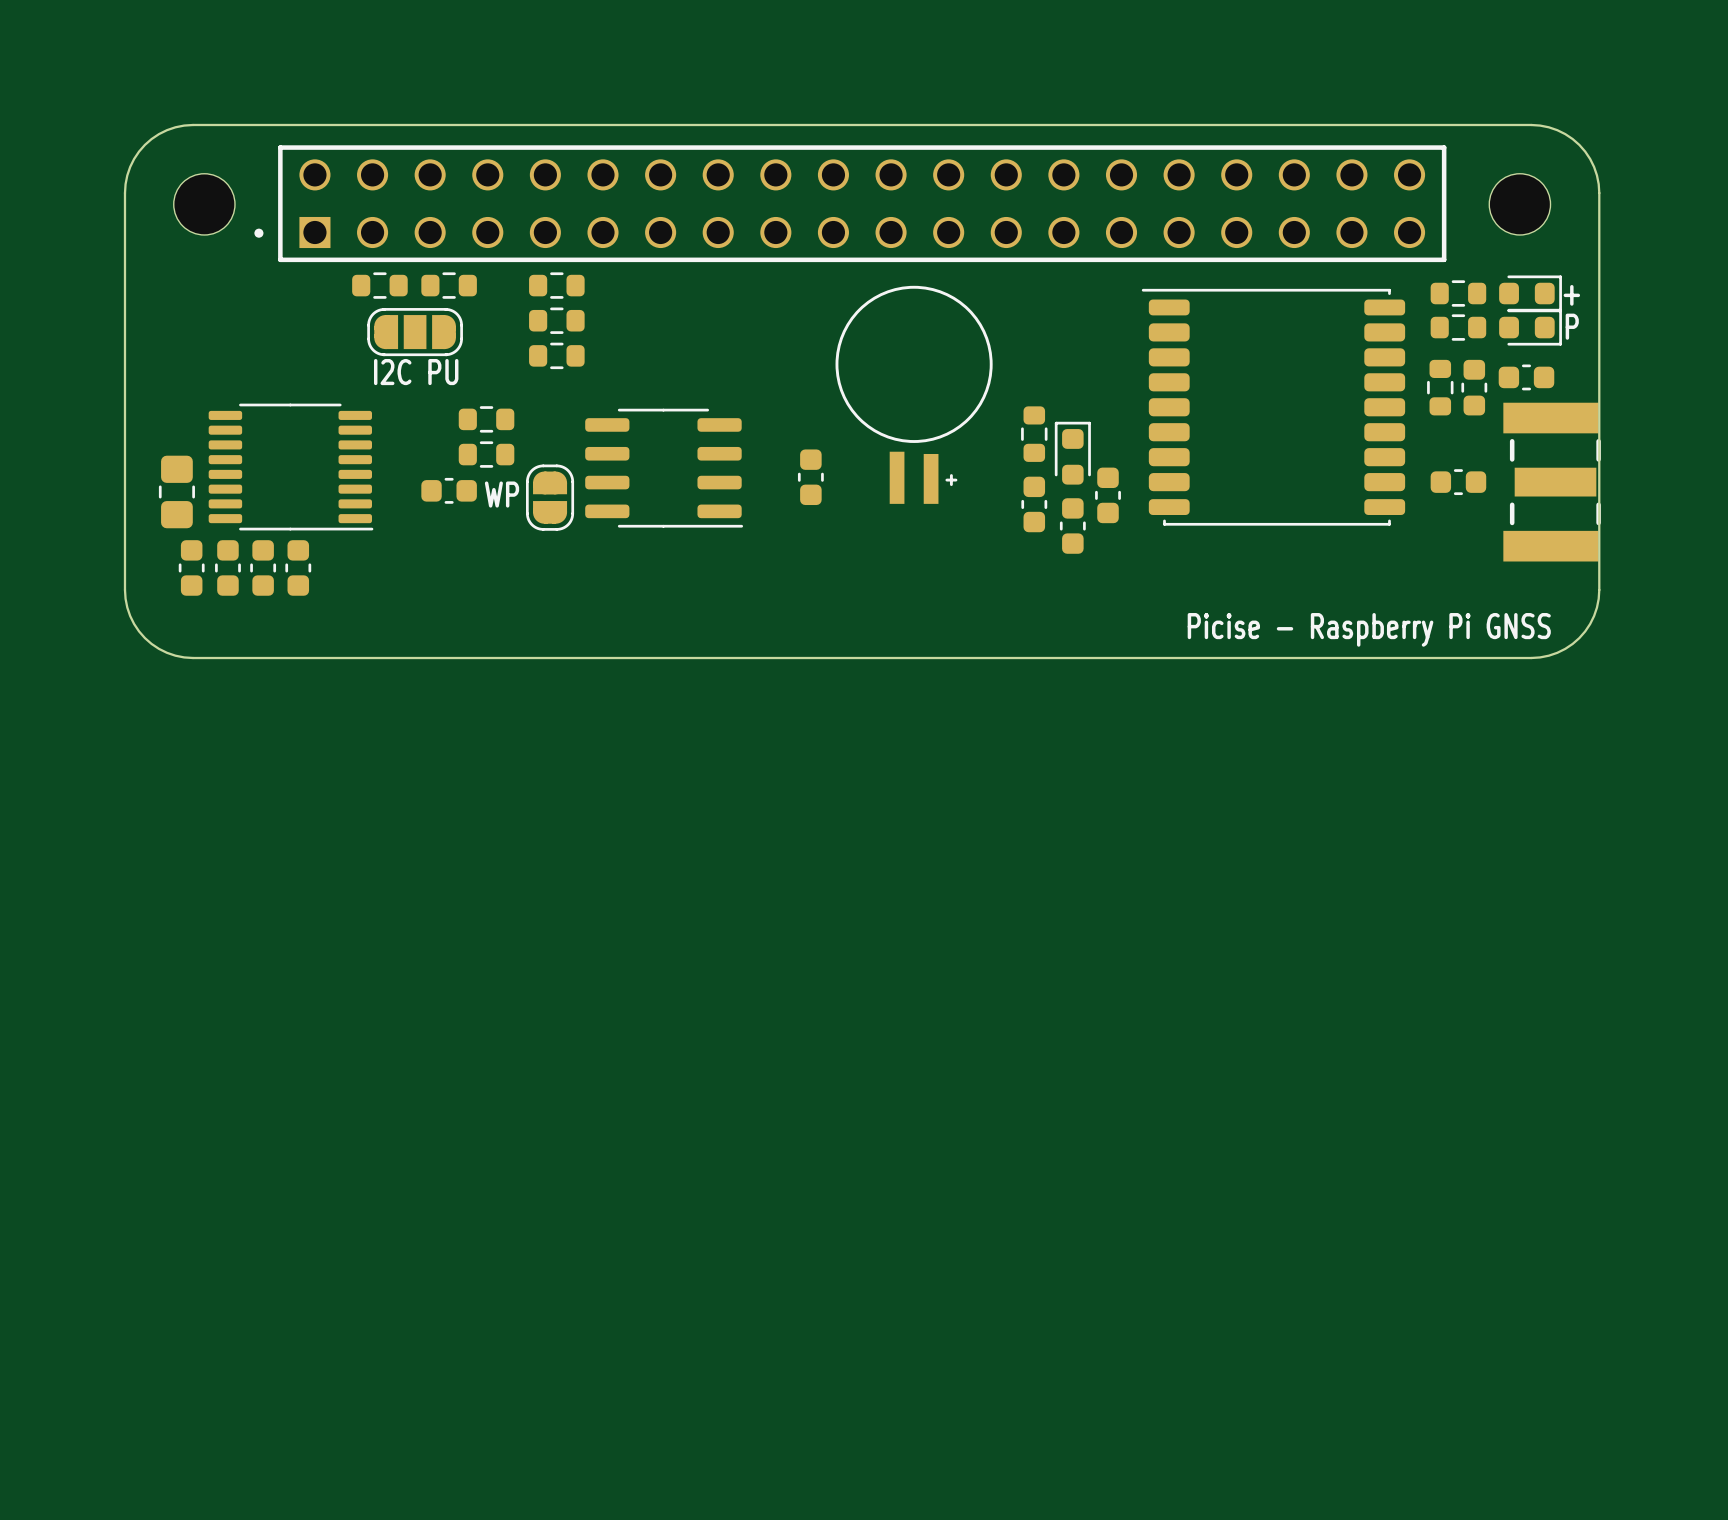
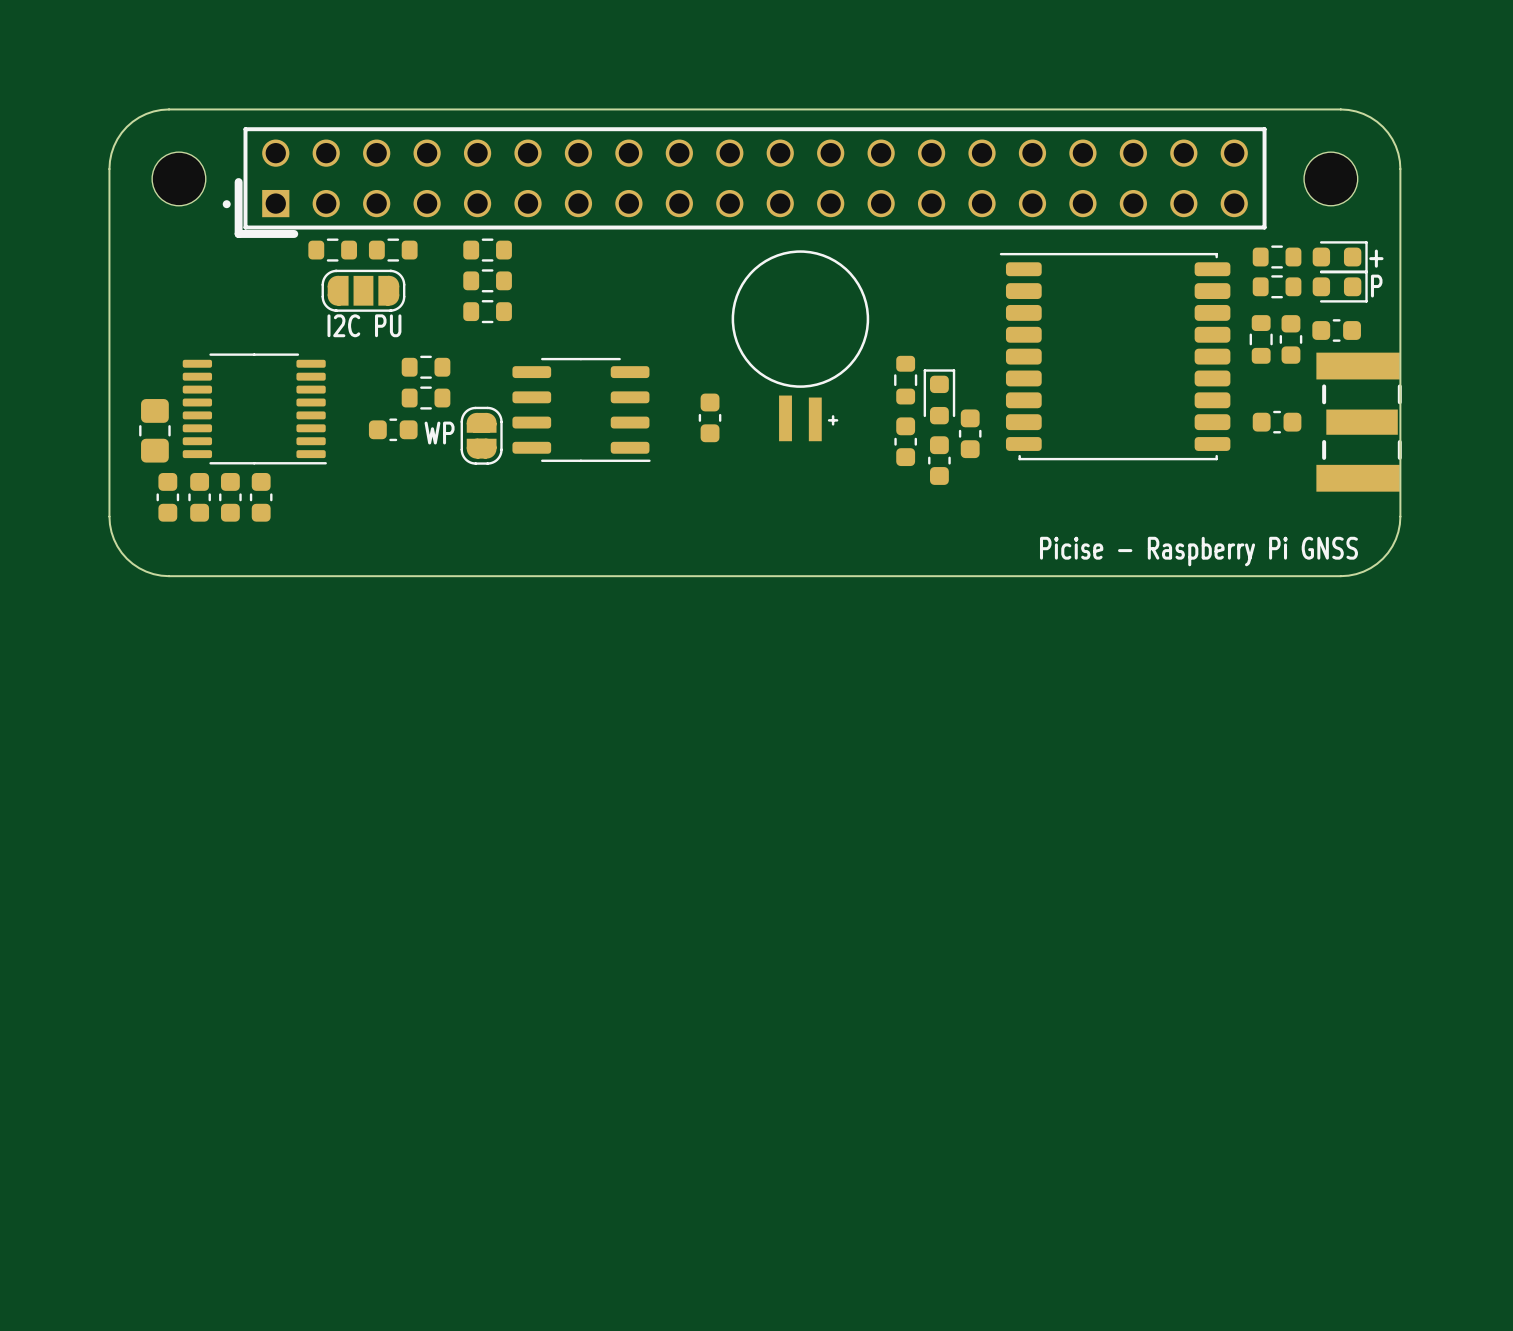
part footprint: [254, 145, 1447, 263] -> [222, 127, 1267, 238]

